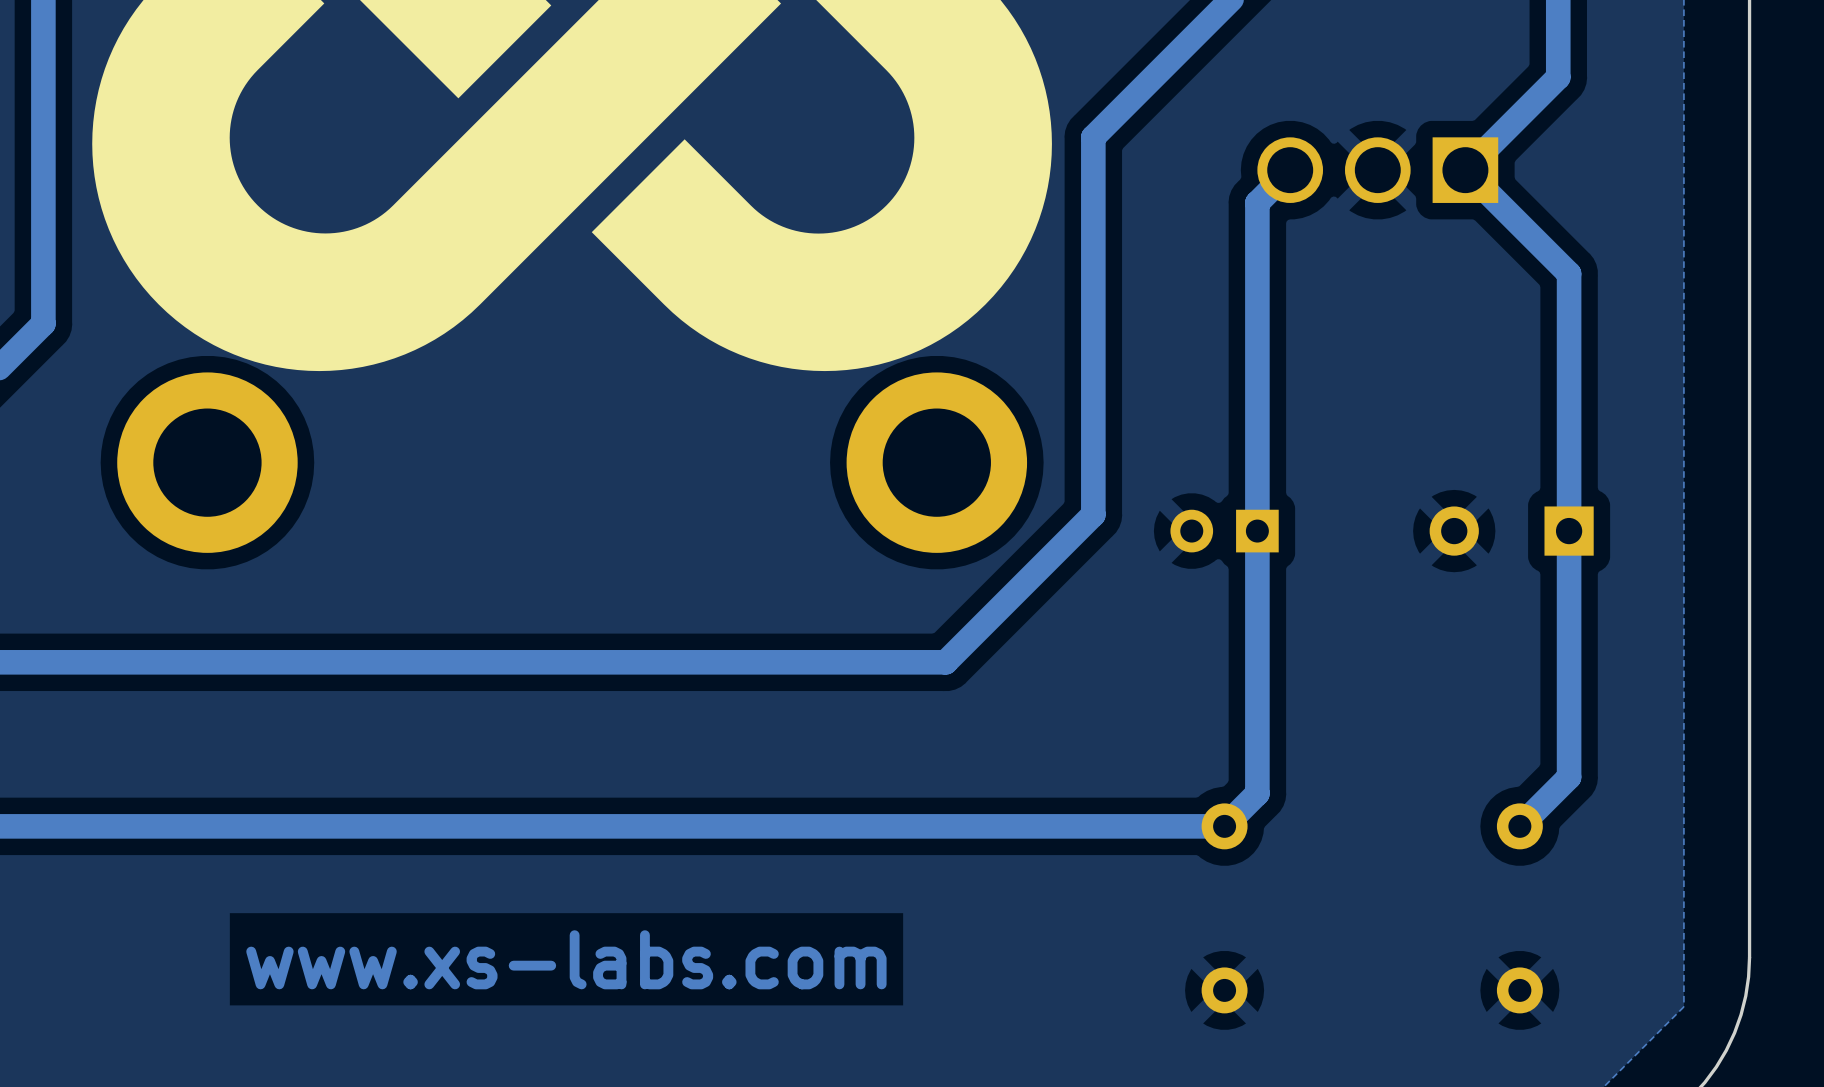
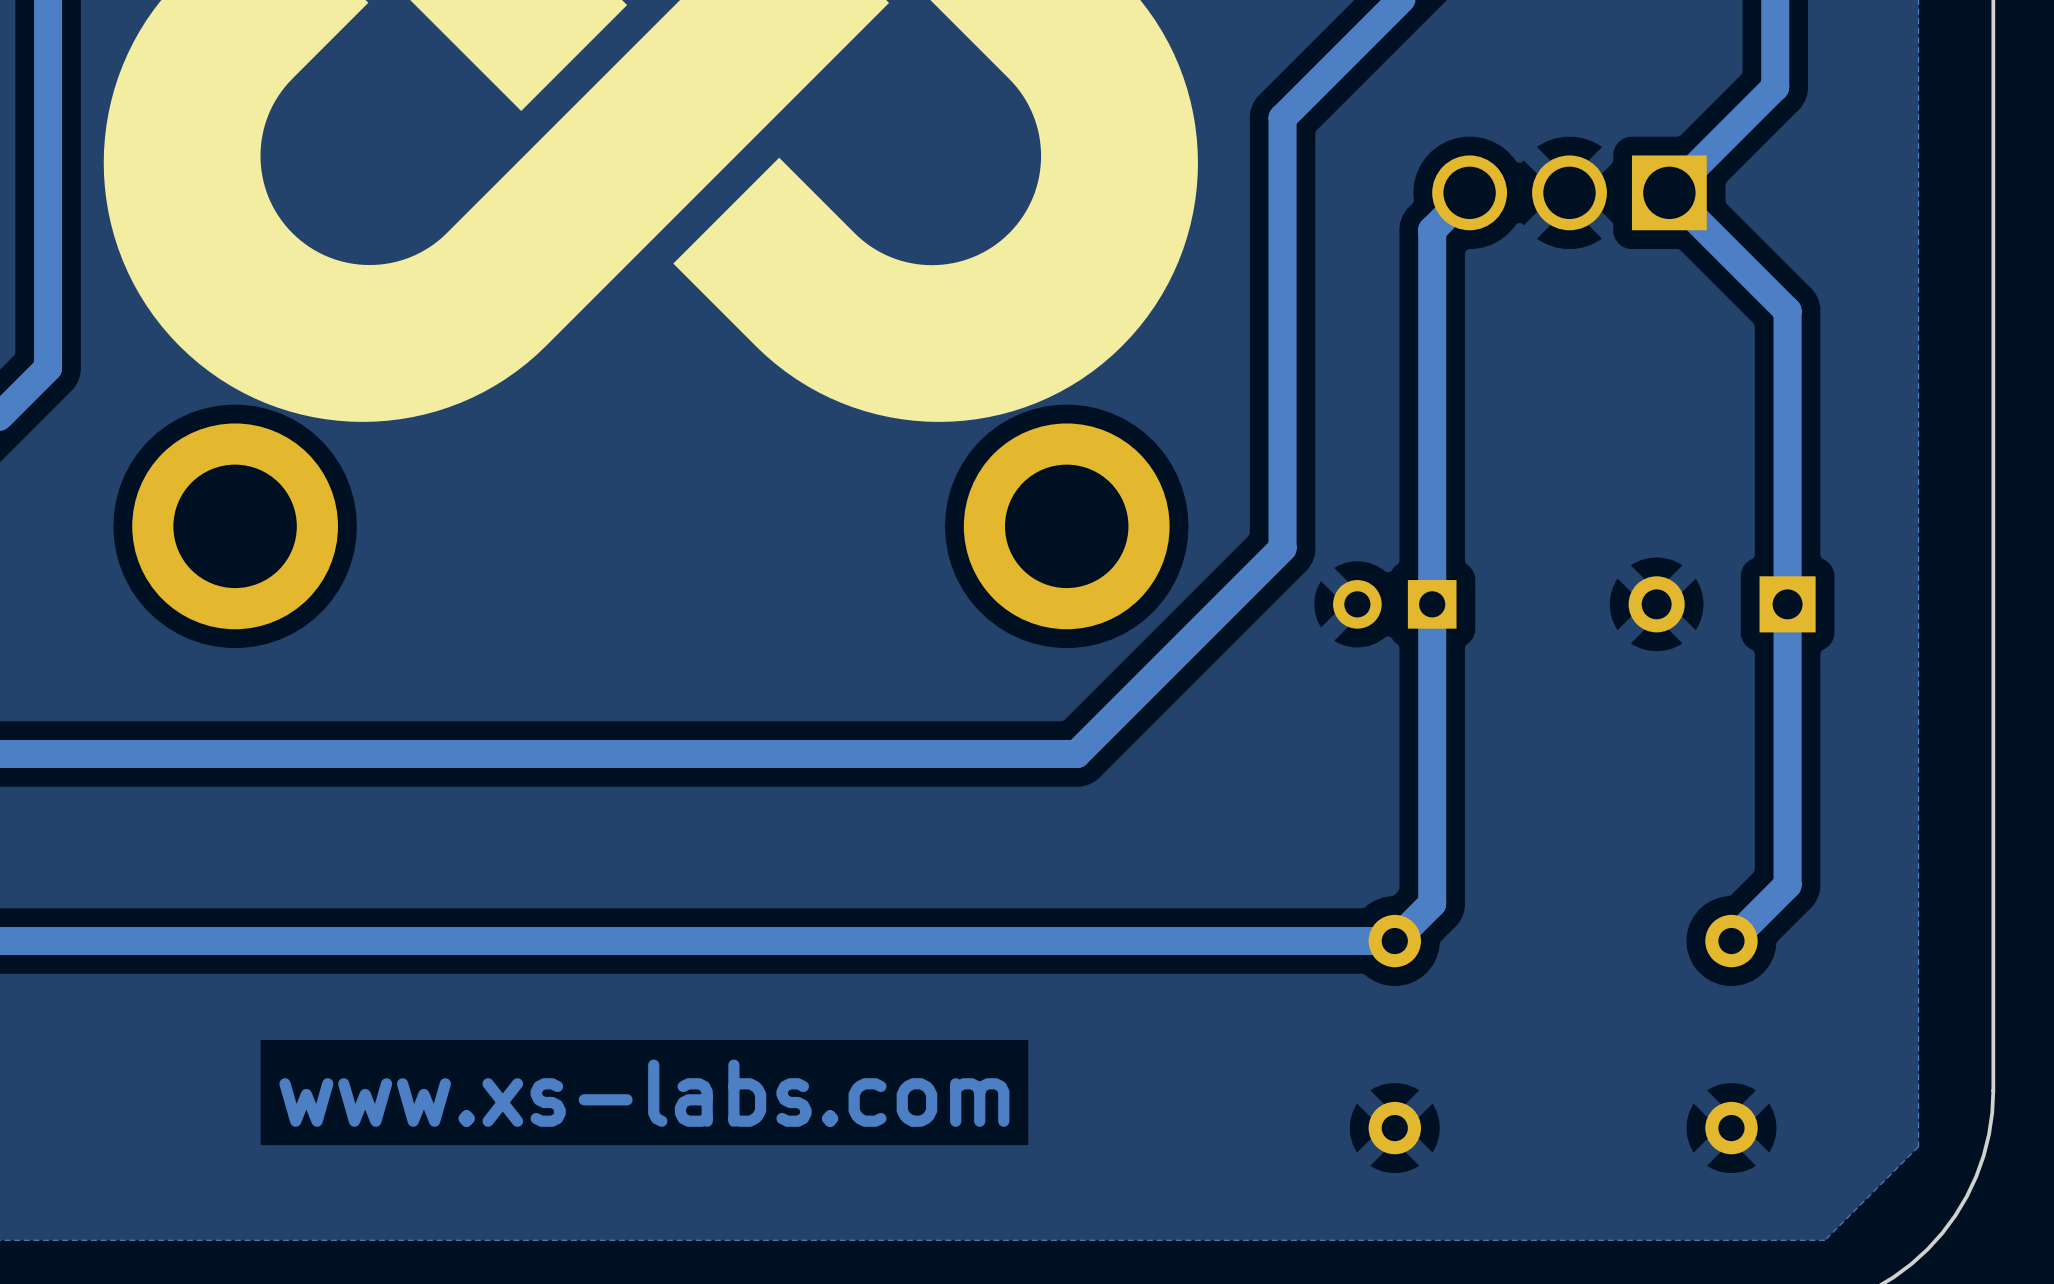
track: (1126, 104) (1093, 137) (1093, 514) -> (1282, 118) (1282, 548) (1245, 585)

